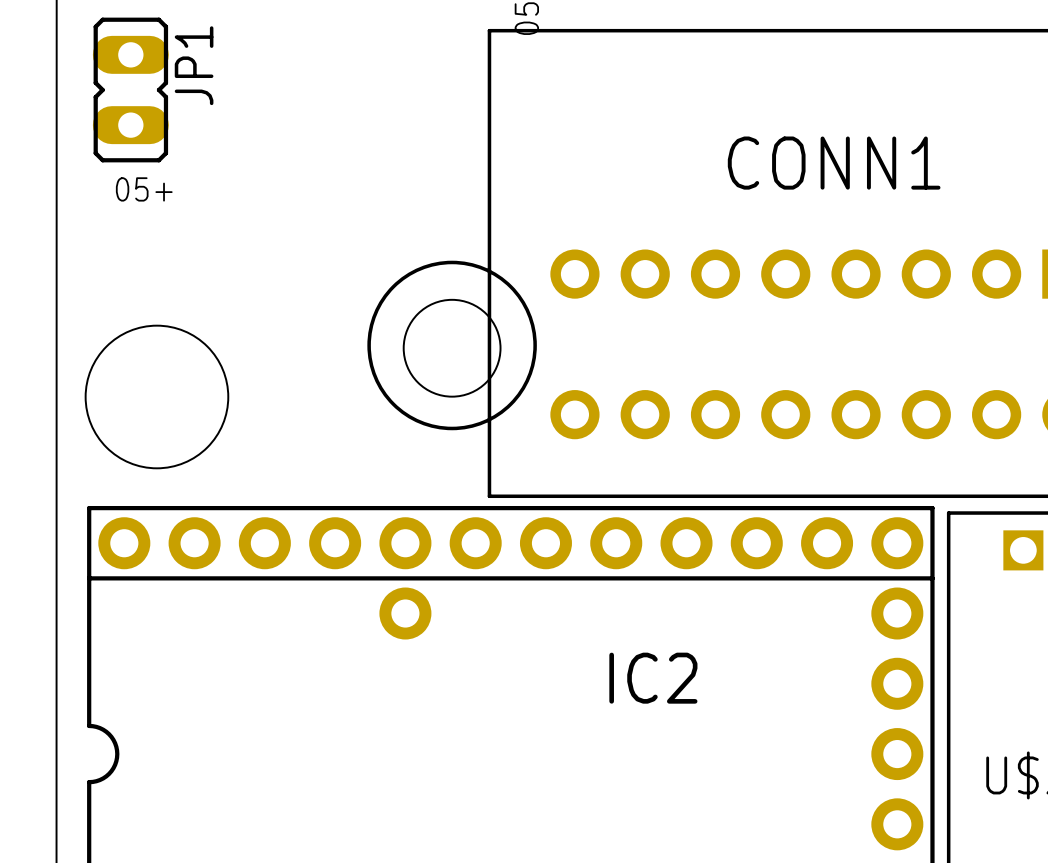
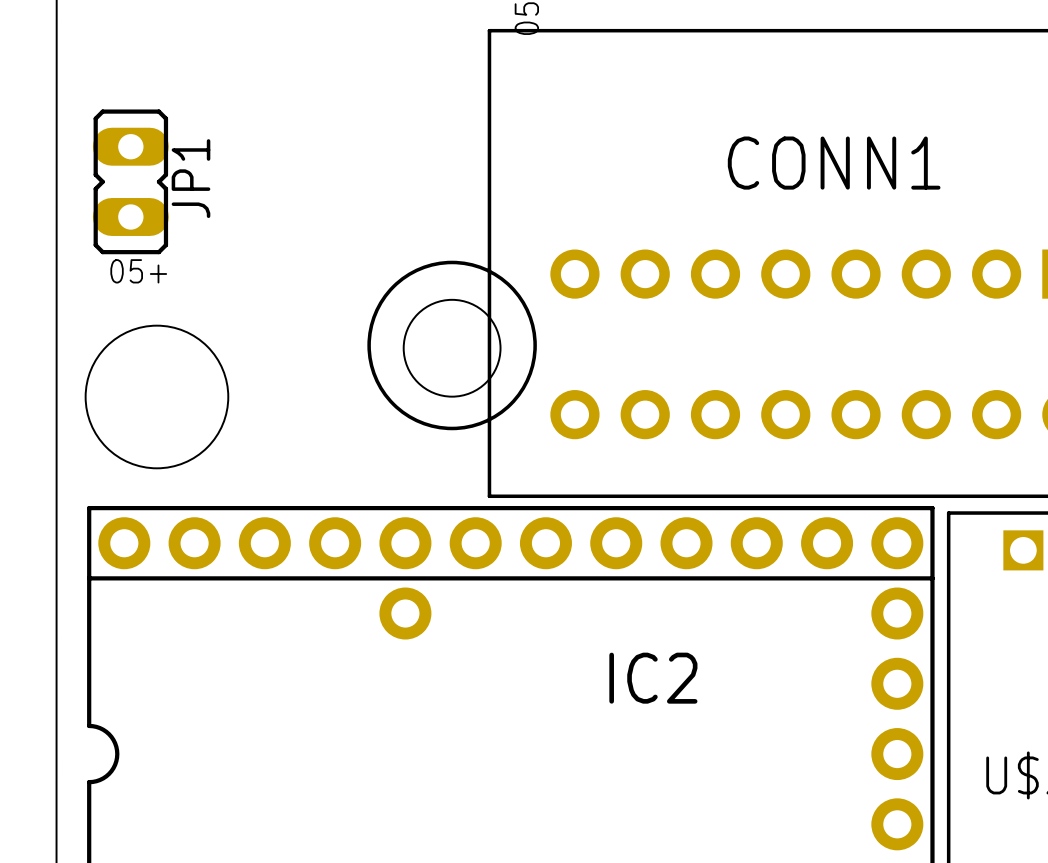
JP1 name position: JP1 (194, 65) -> JP1 (190, 178)
JP1 position: (130, 90) -> (130, 181)
text position: 05+ (144, 189) -> 05+ (138, 271)

